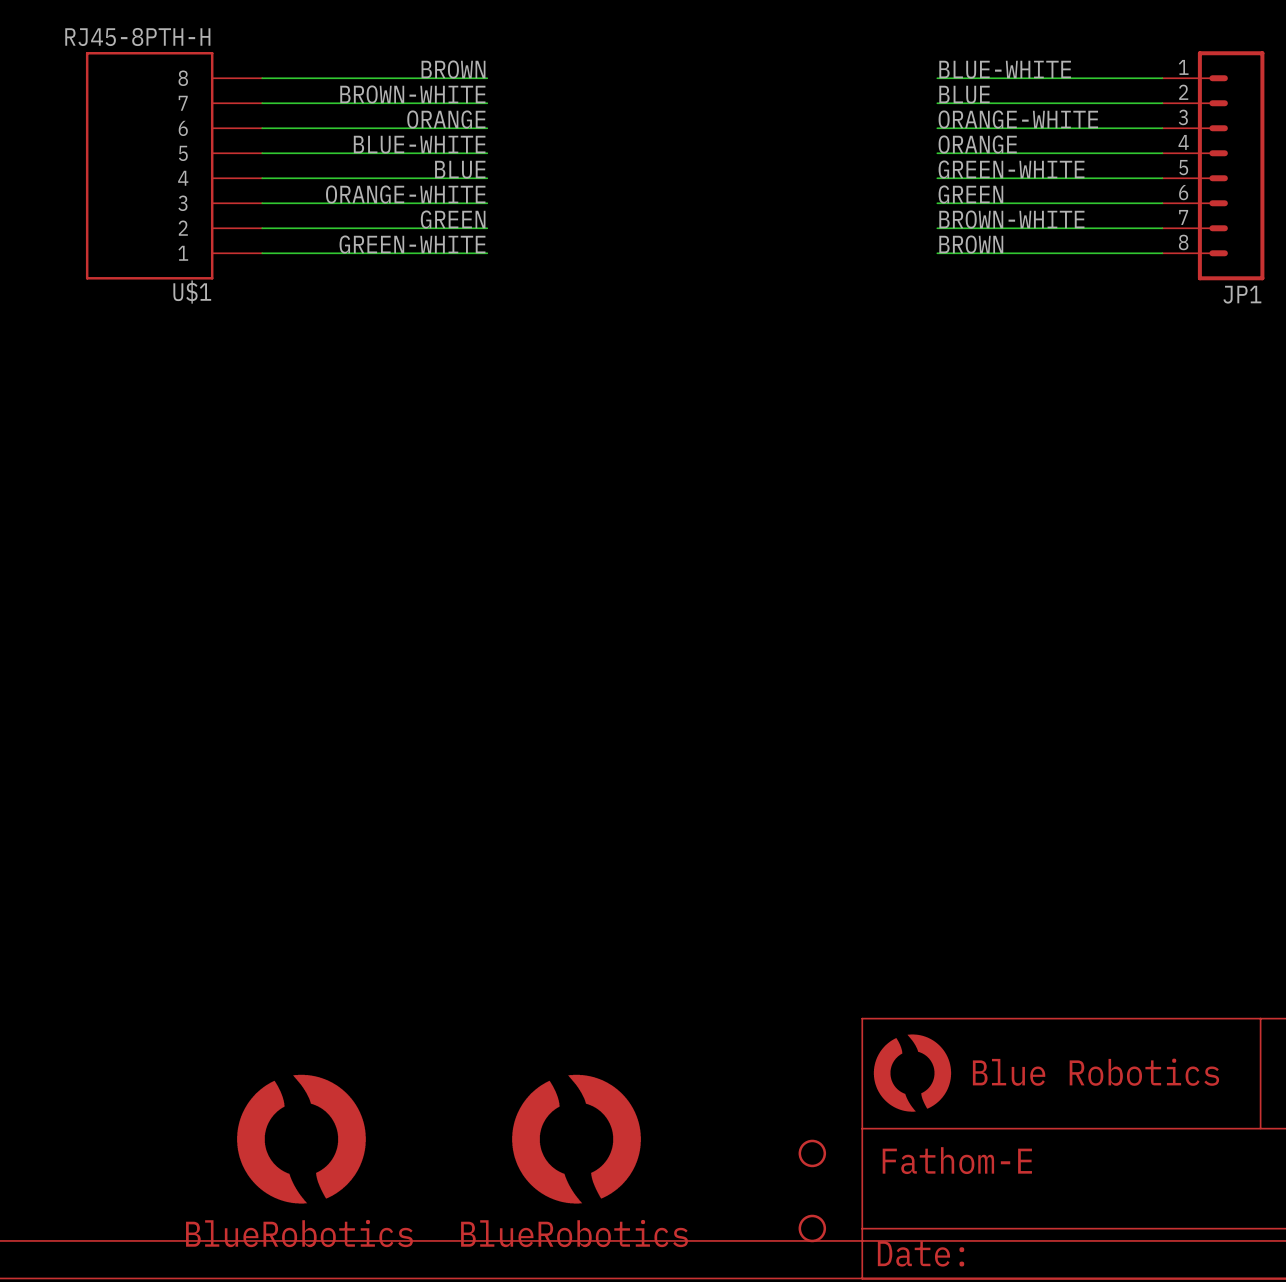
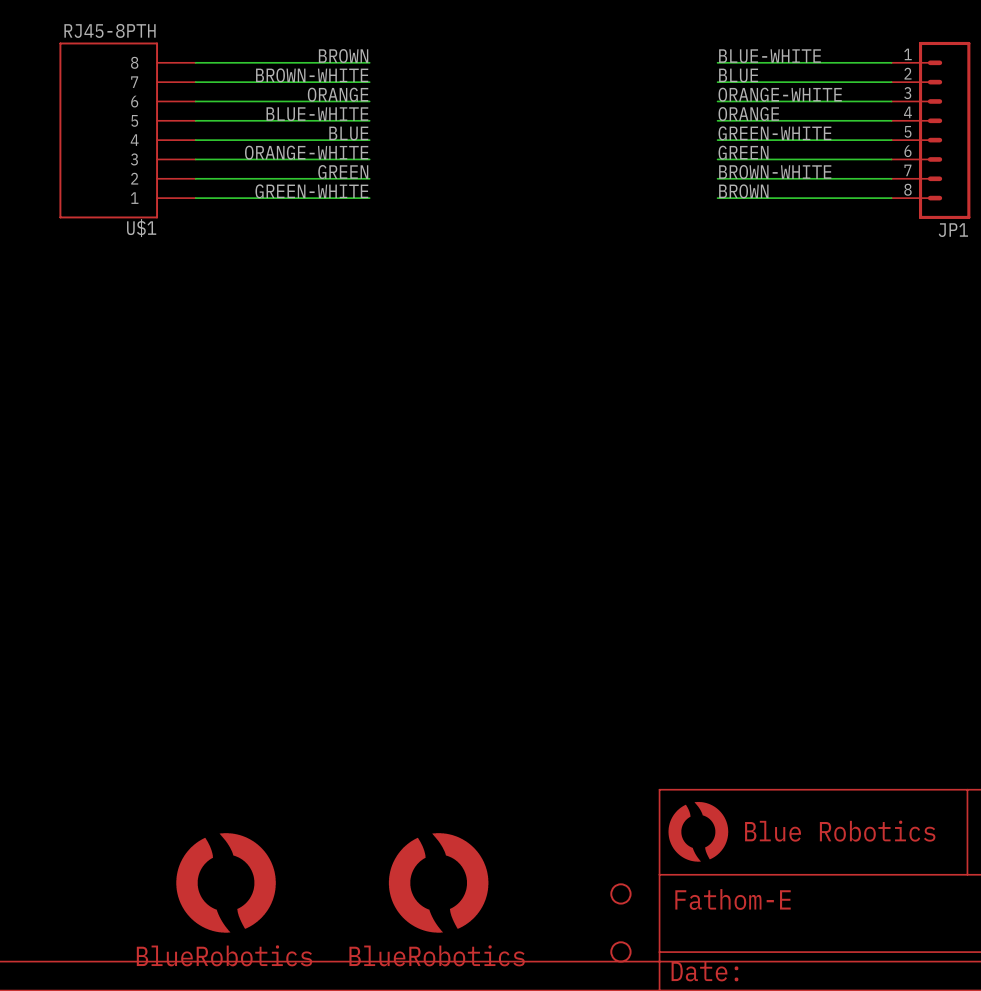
U$1 value: RJ45-8PTH-H (137, 36) -> RJ45-8PTH (110, 30)

